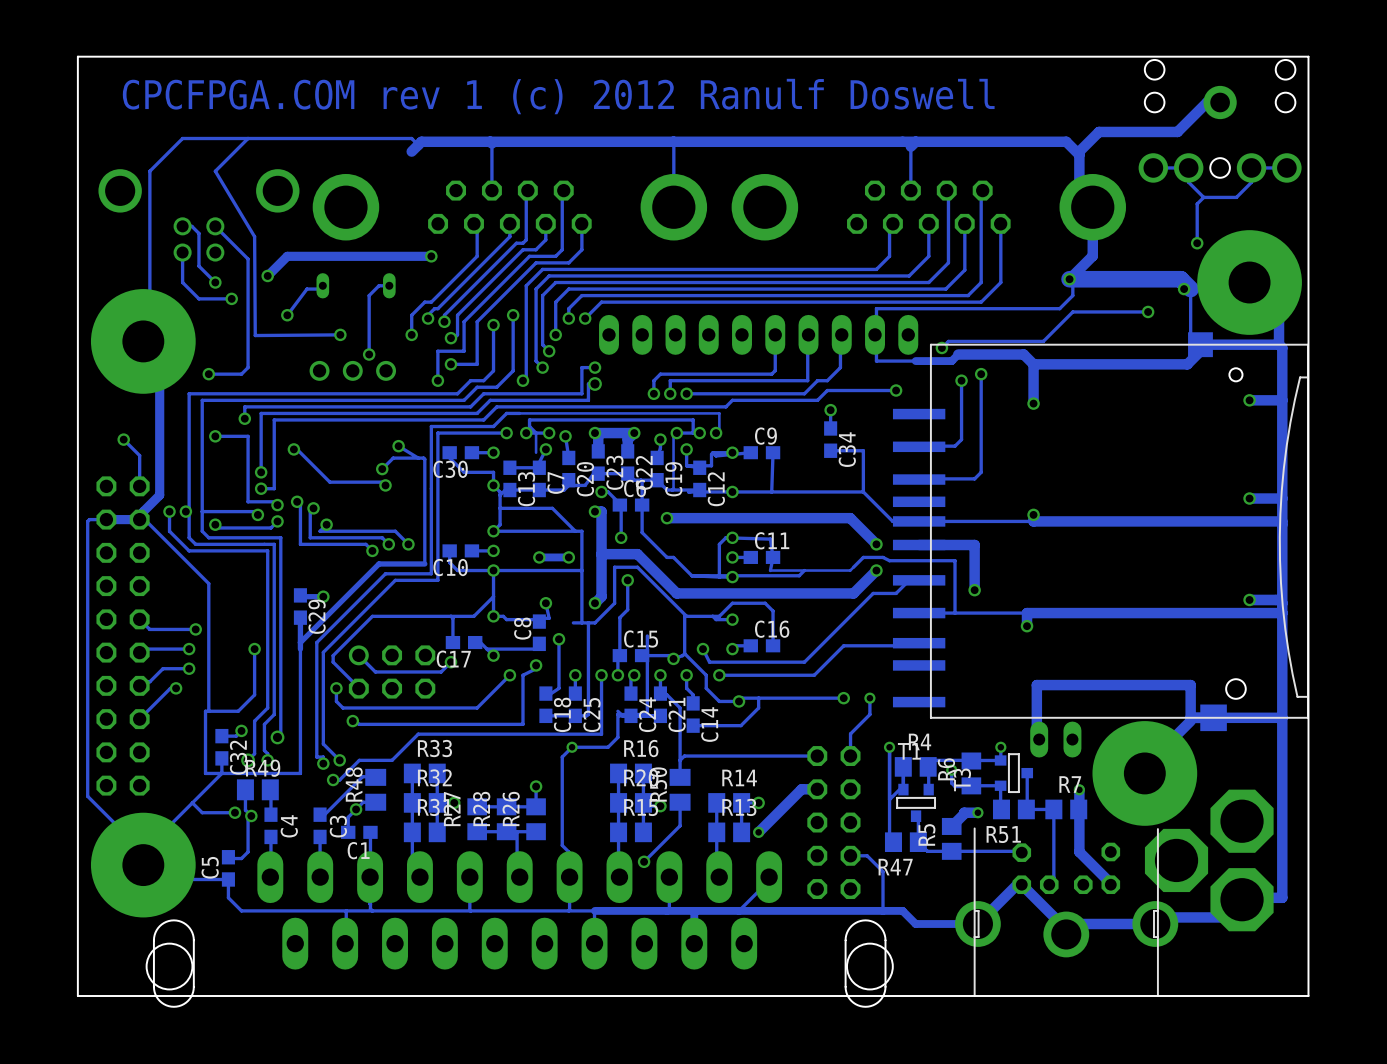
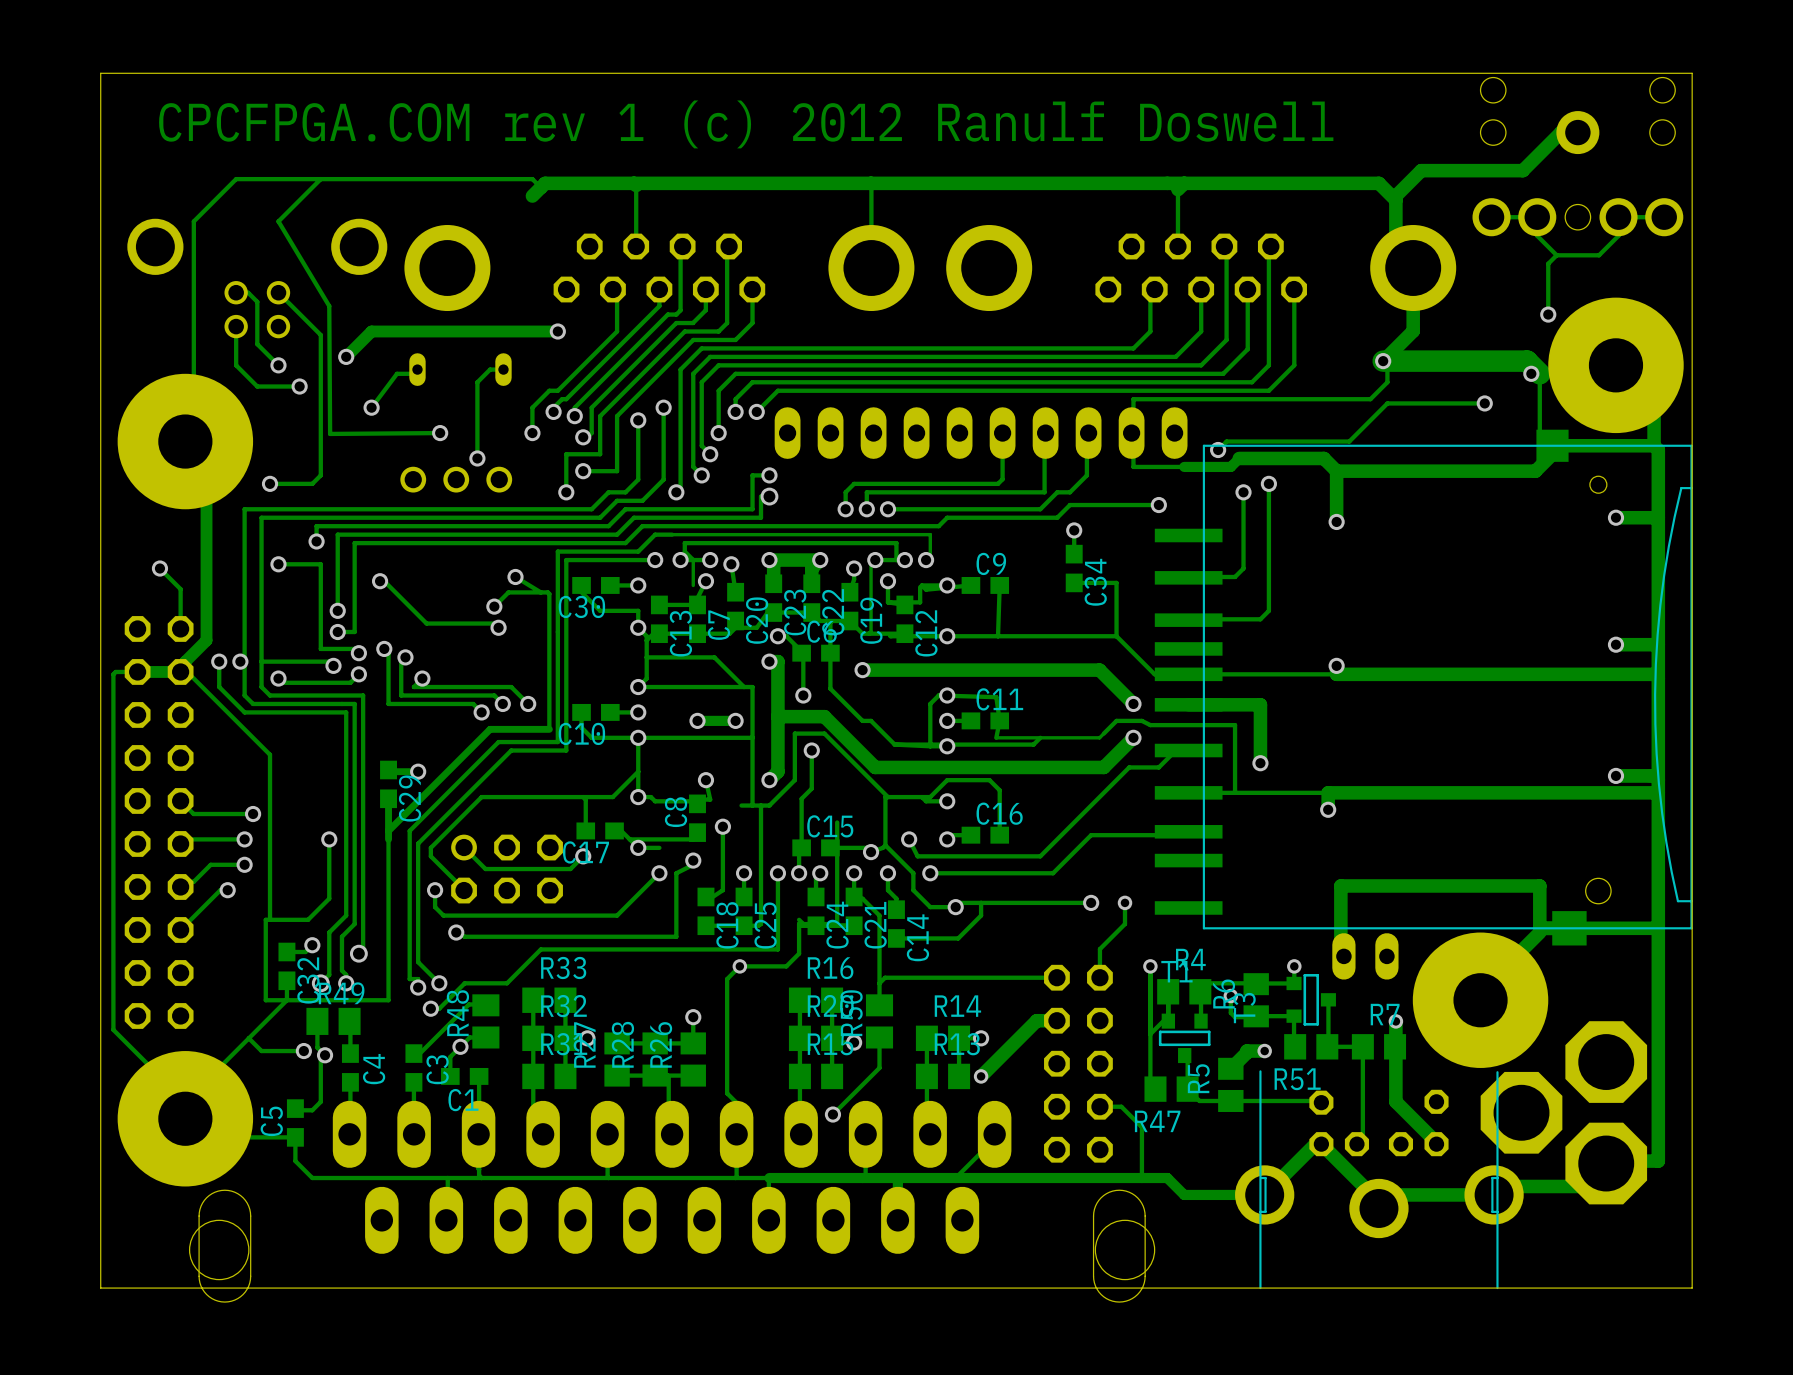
track: none -> (659, 847) (638, 847)

